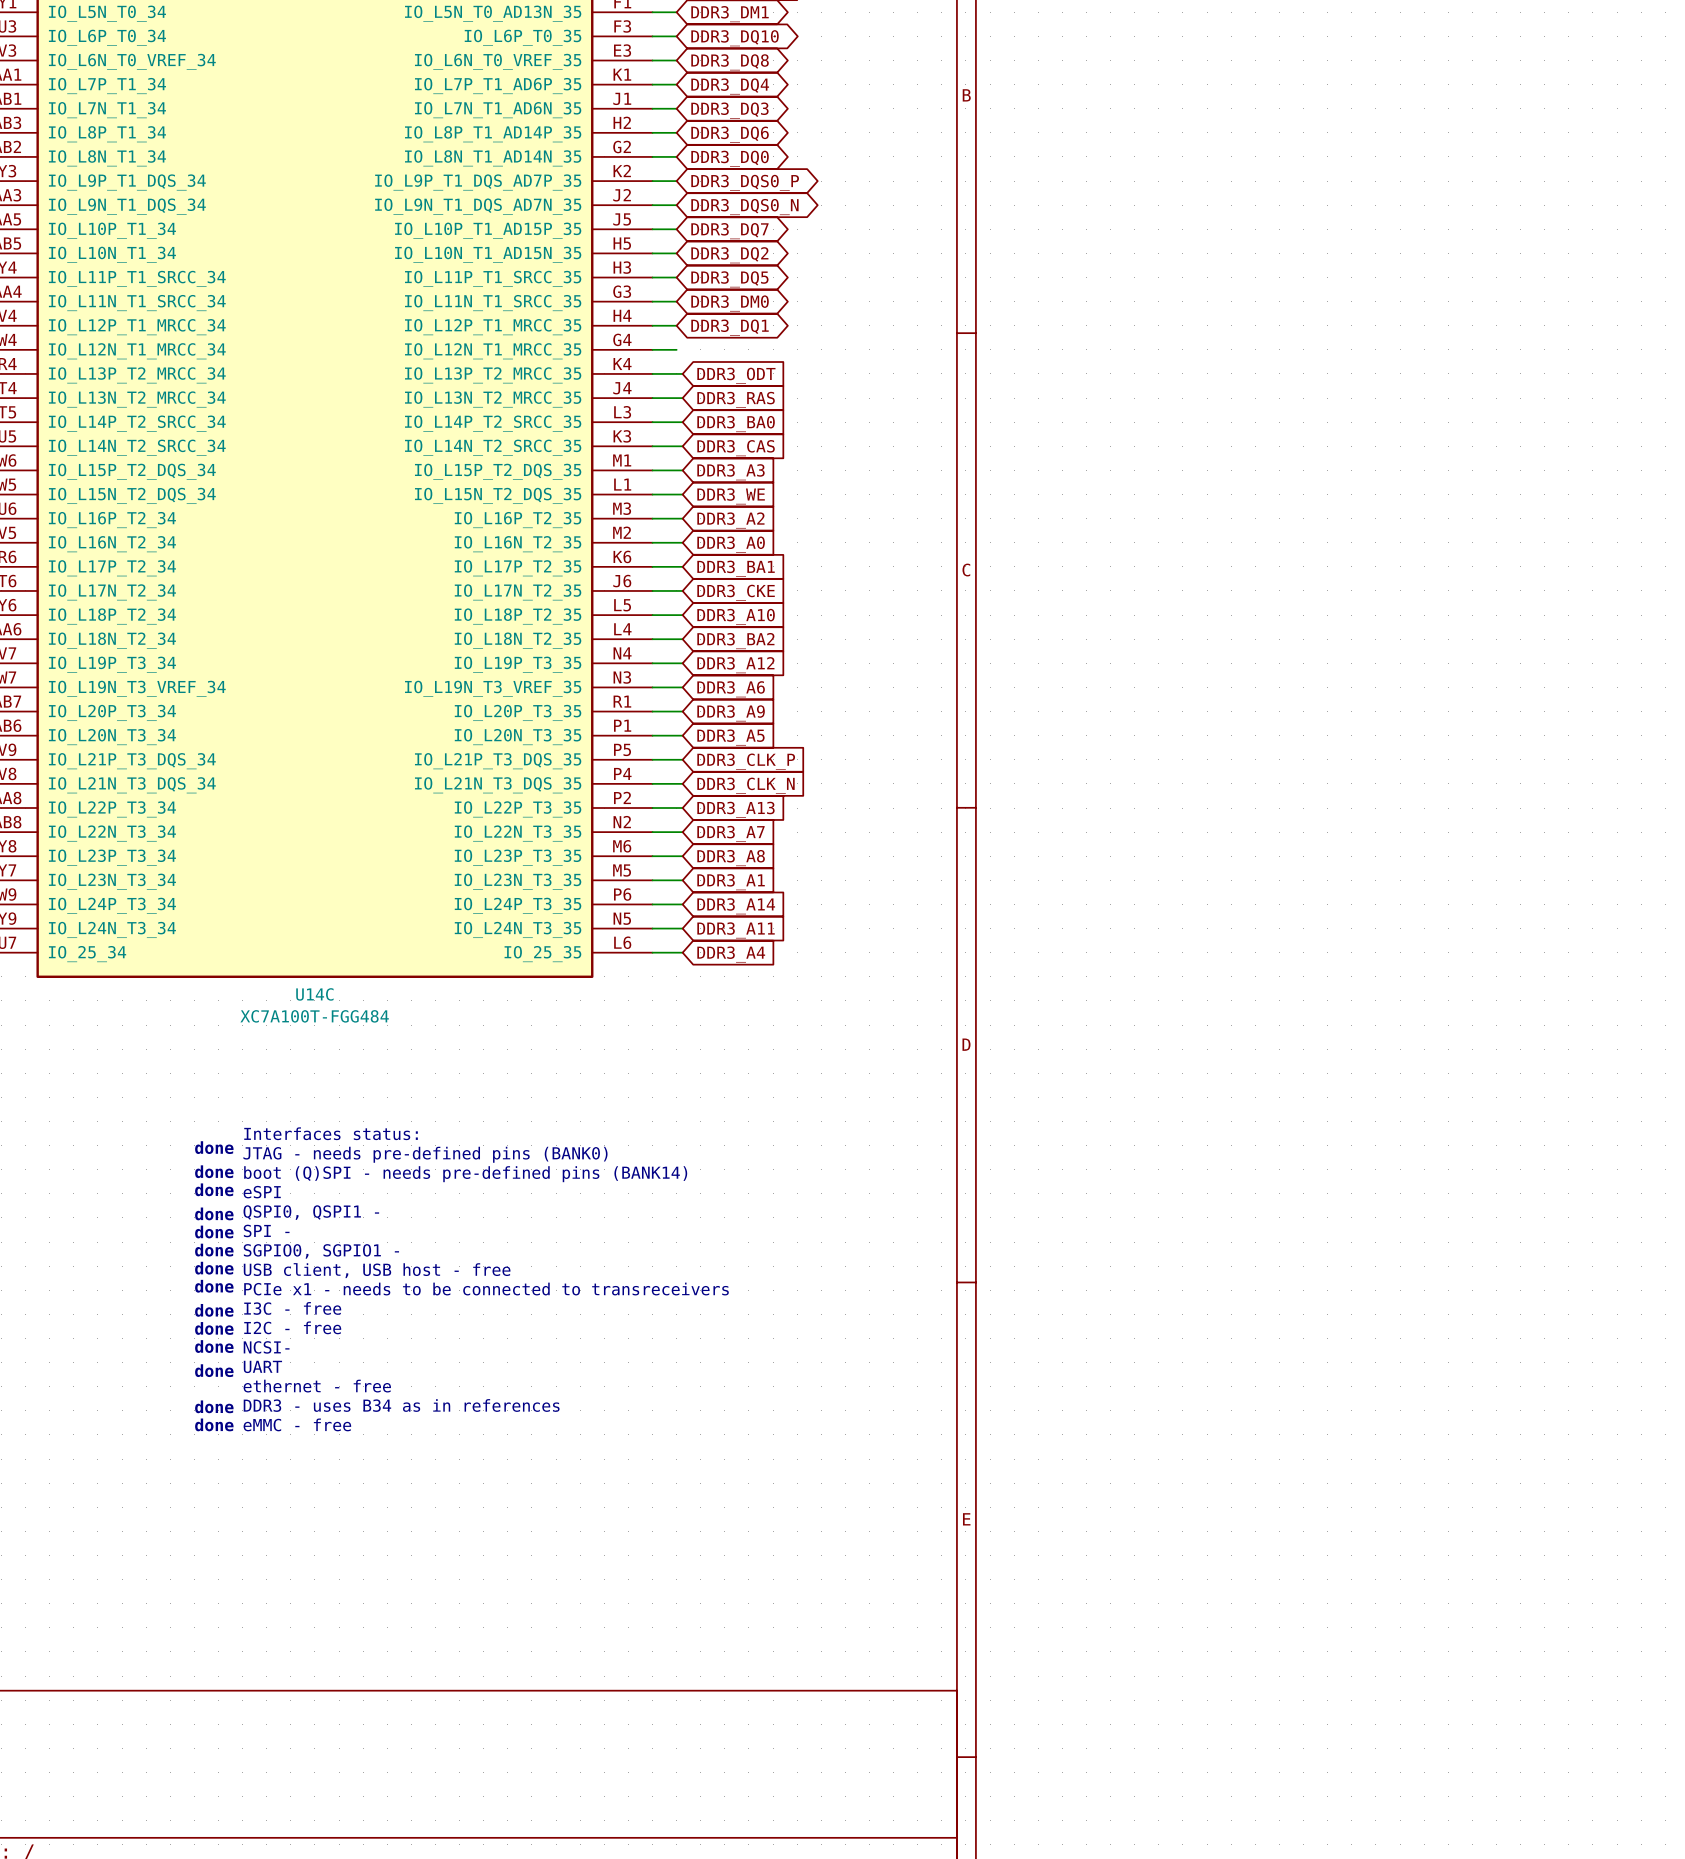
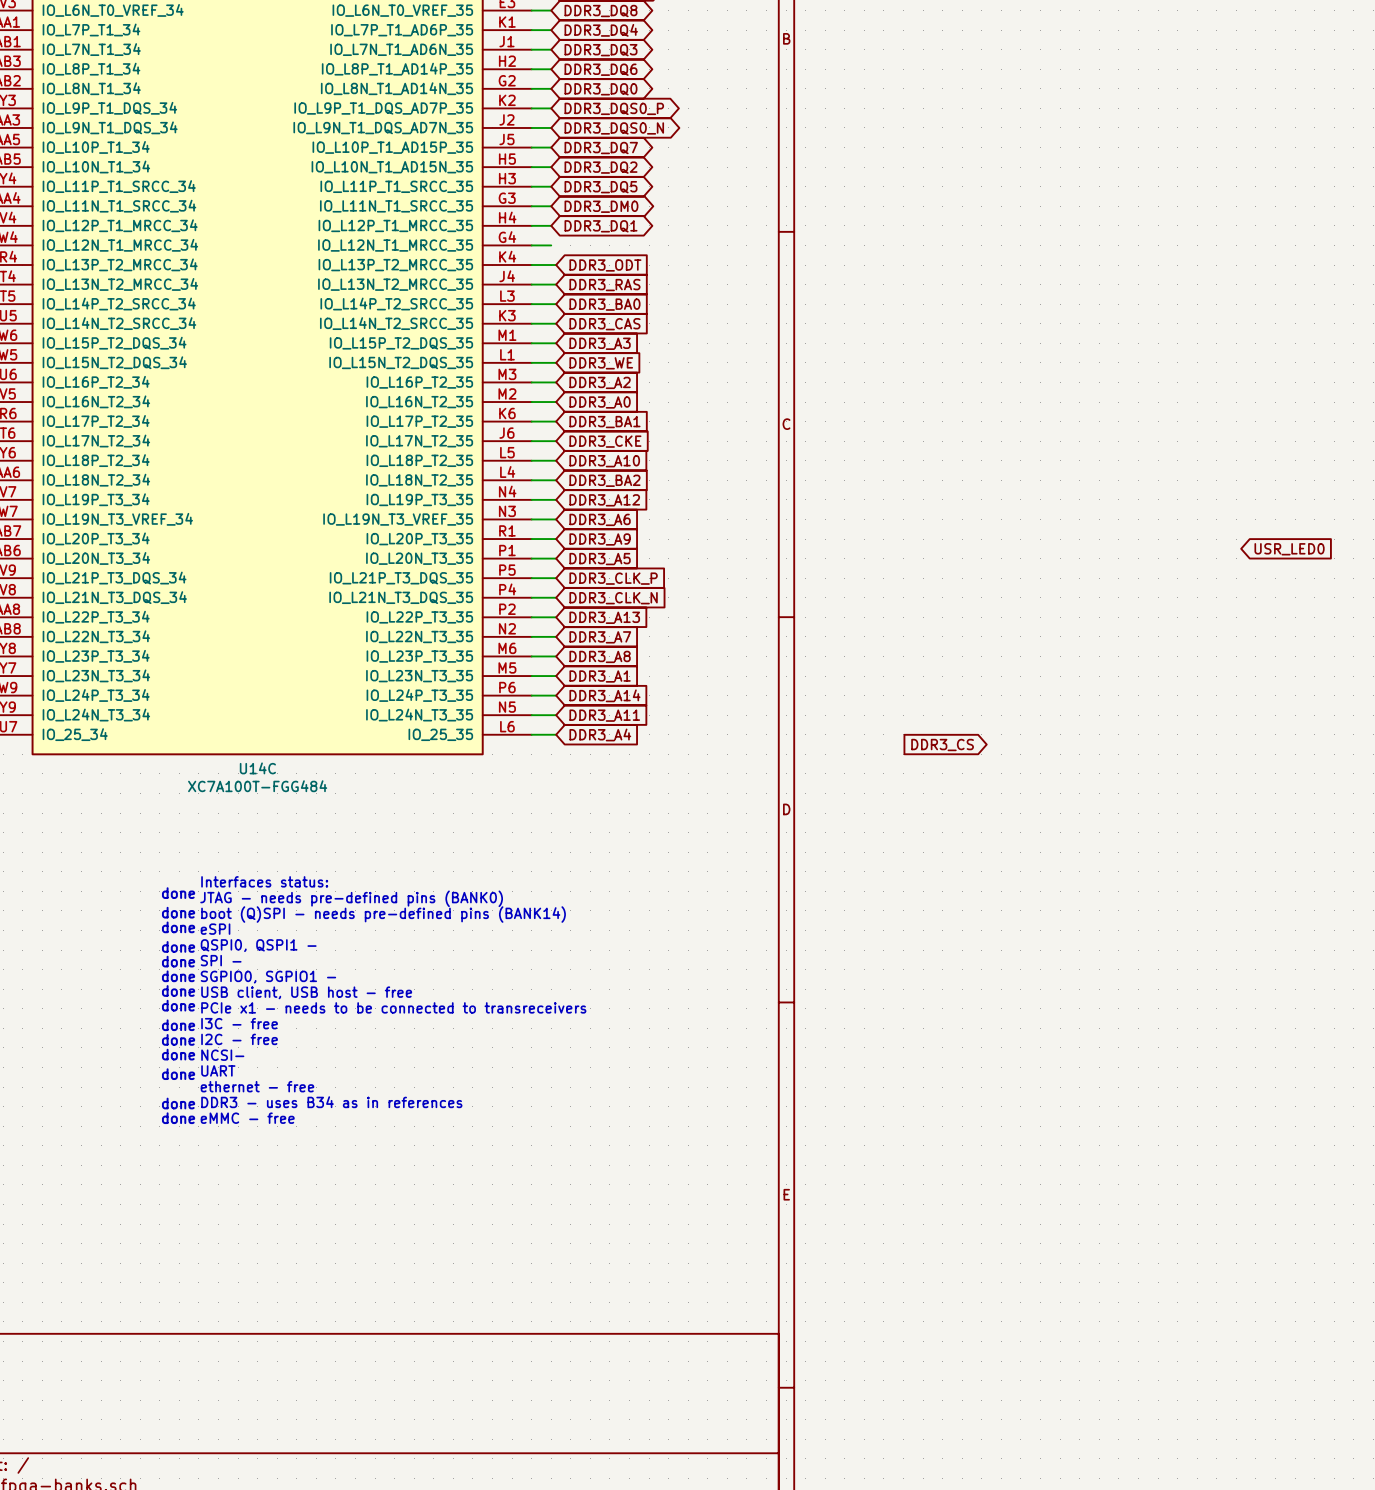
global label: none -> USR_LED0 (1289, 549)
global label: none -> DDR3_CS (942, 745)

